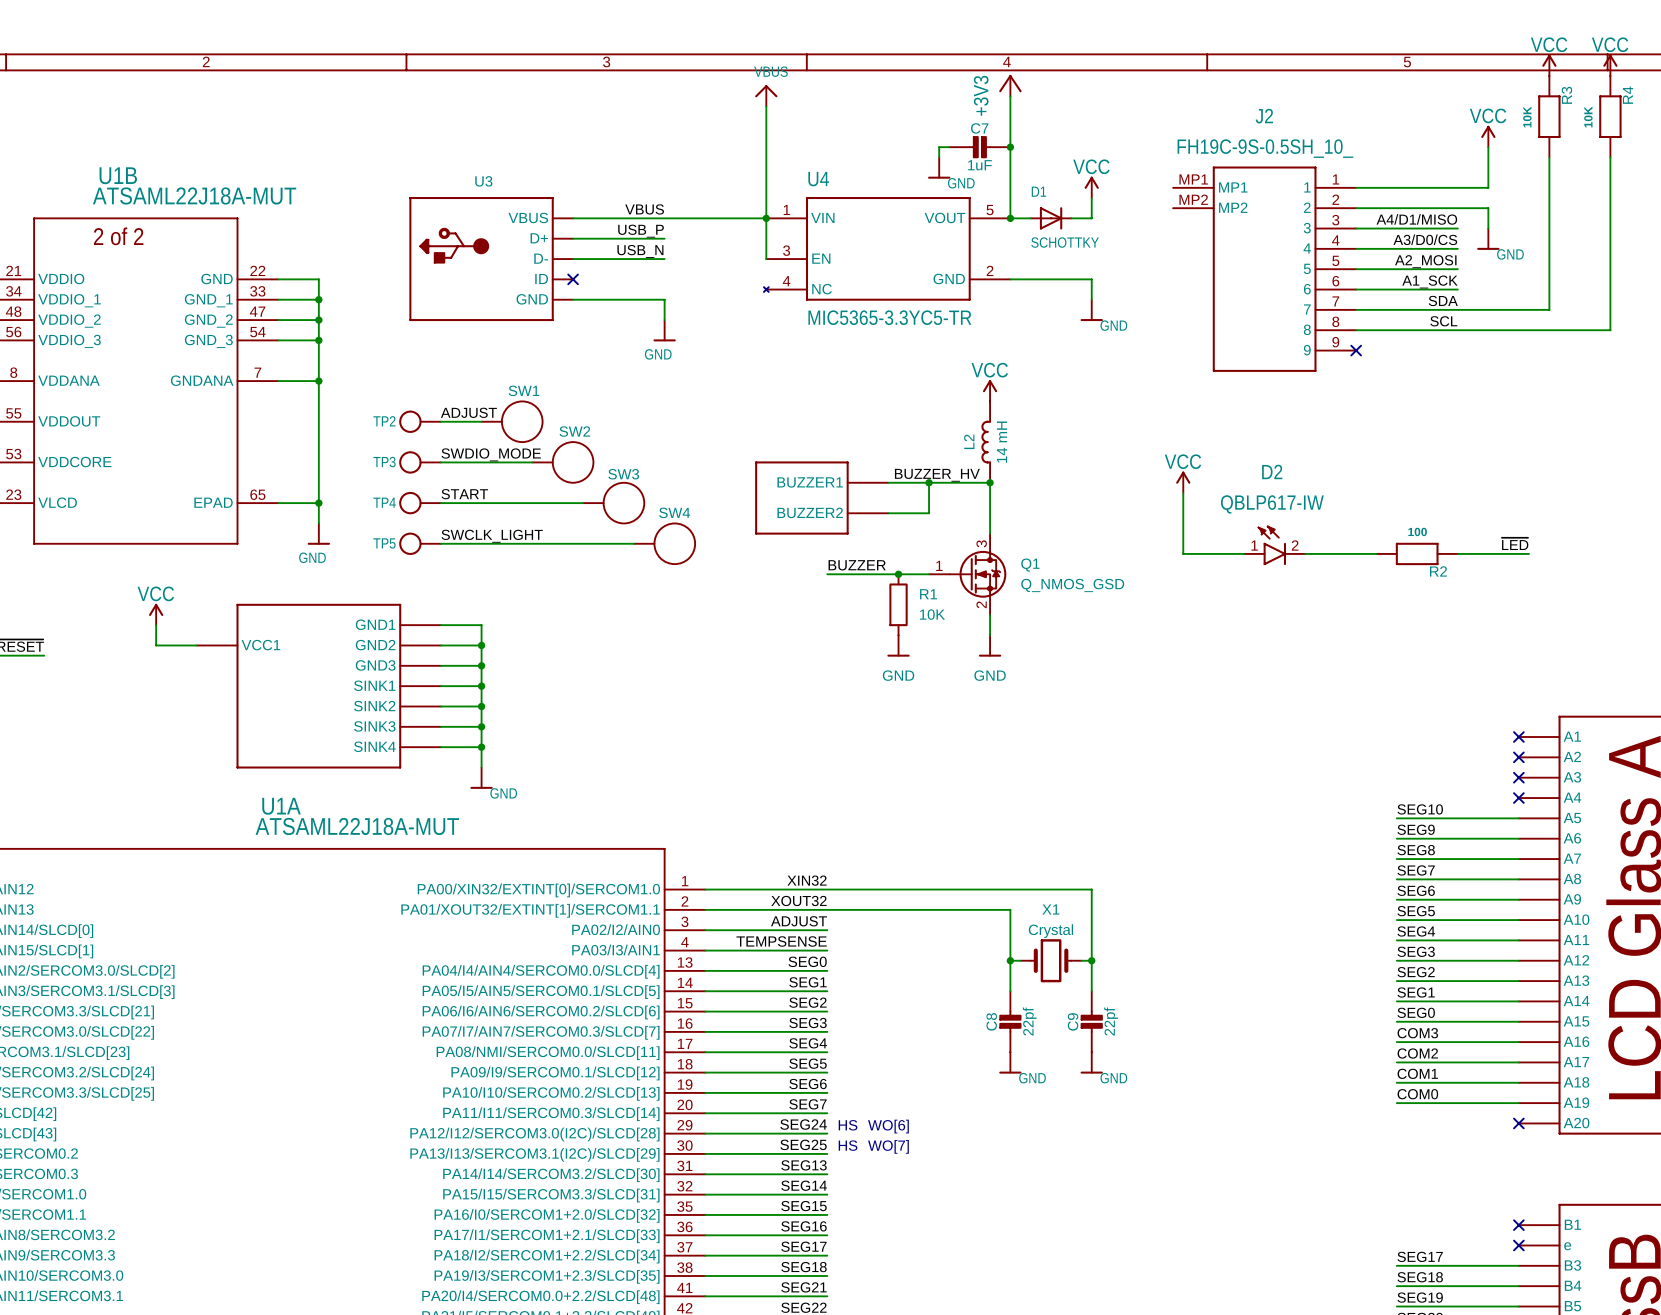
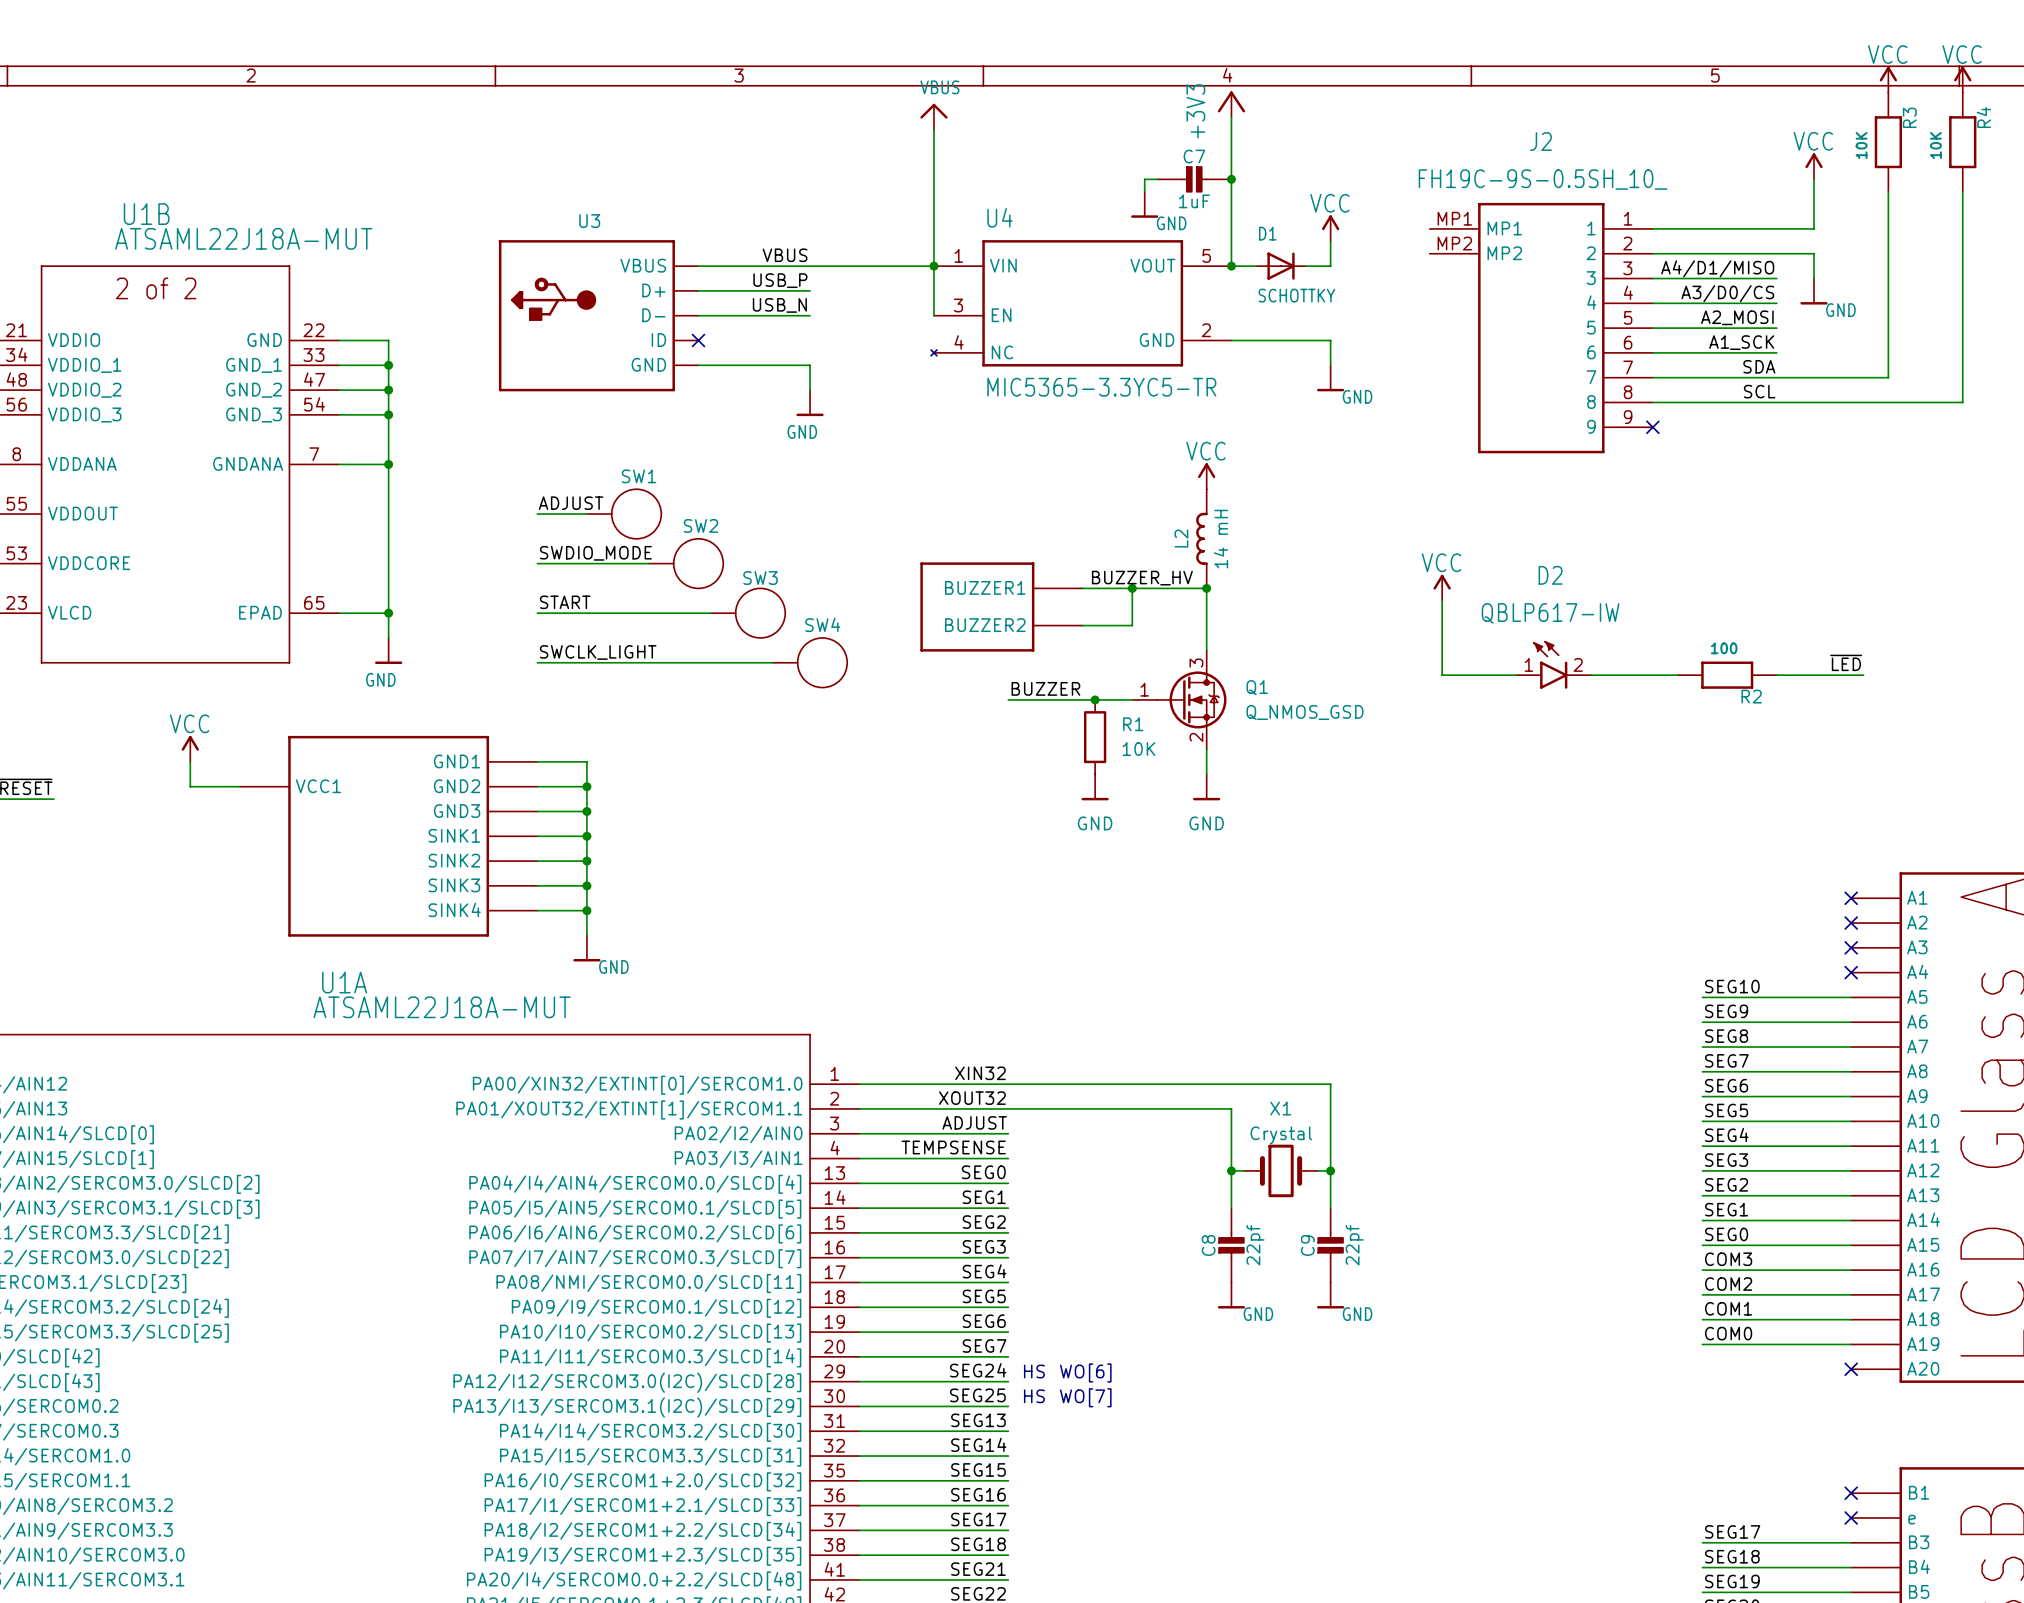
TP2: (420, 421) -> none
TP3: (420, 462) -> none
TP4: (420, 503) -> none
TP5: (420, 543) -> none

